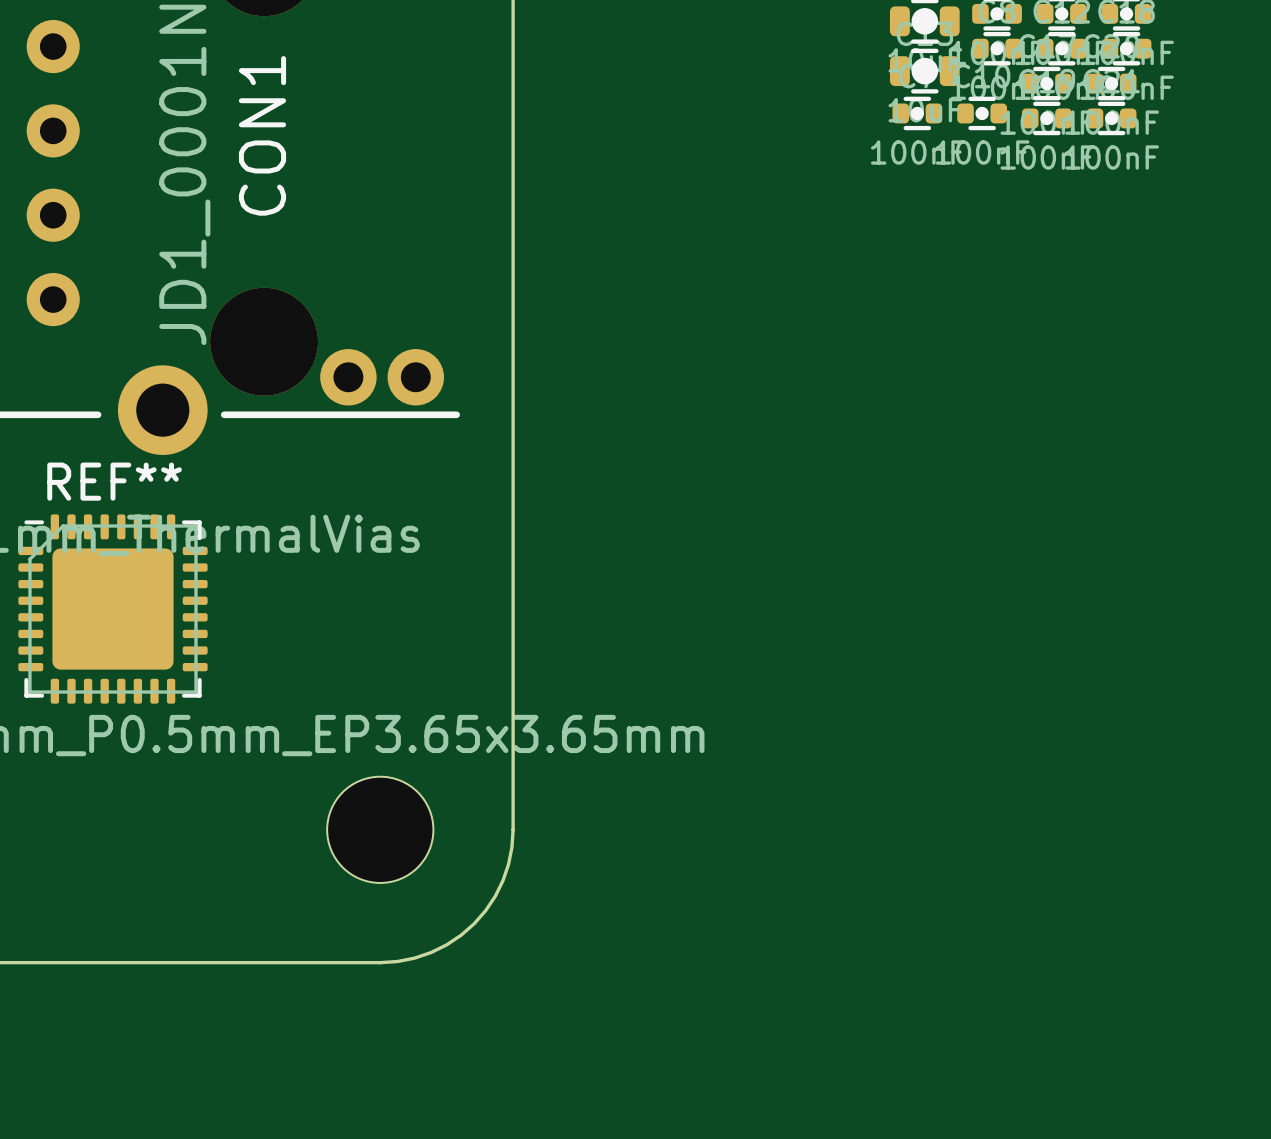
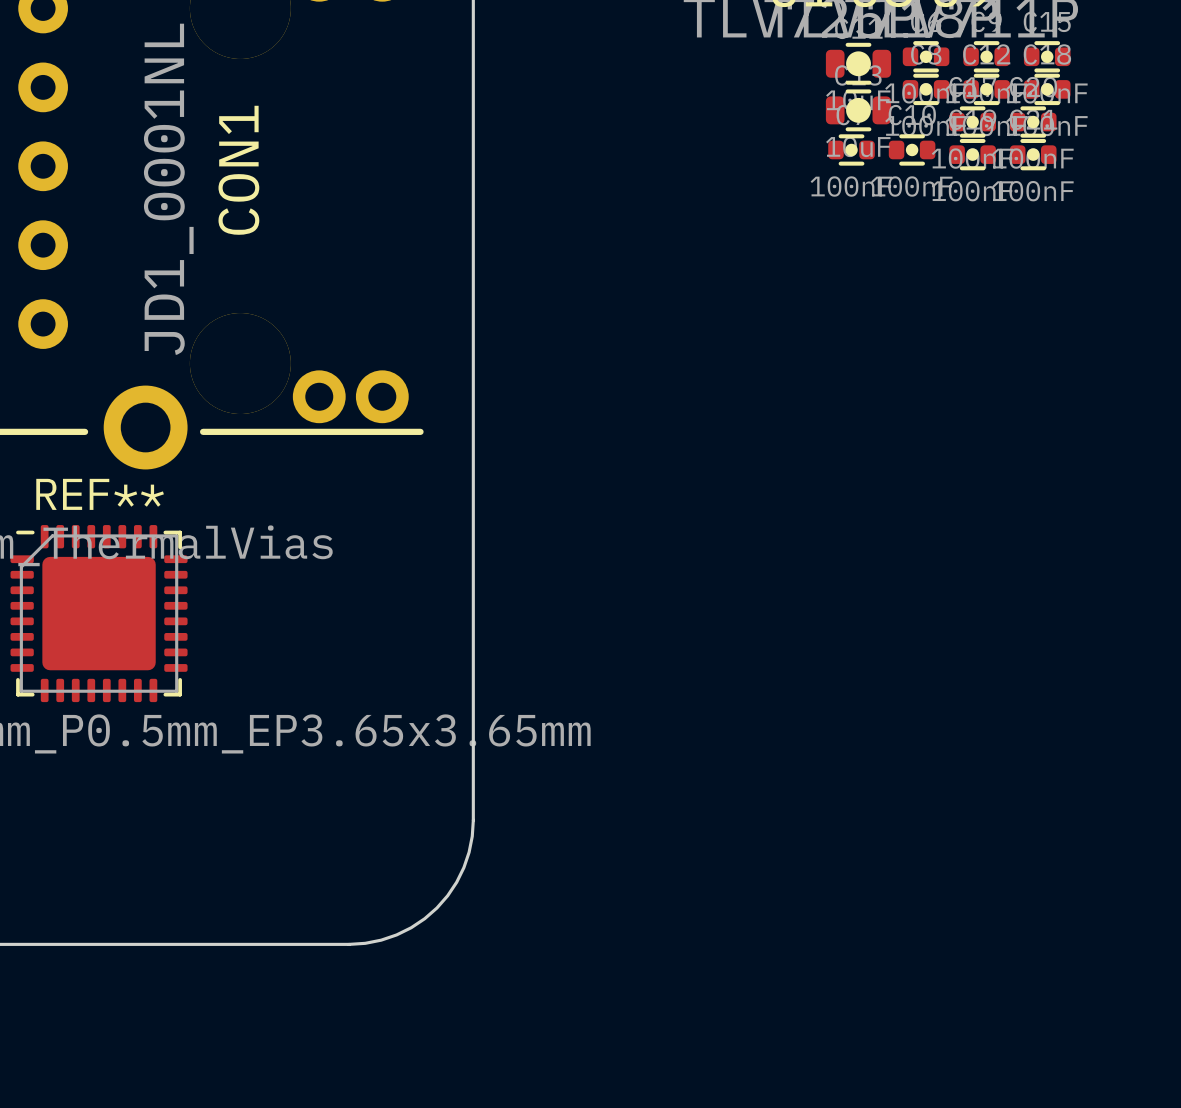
part: (380, 829) -> none

